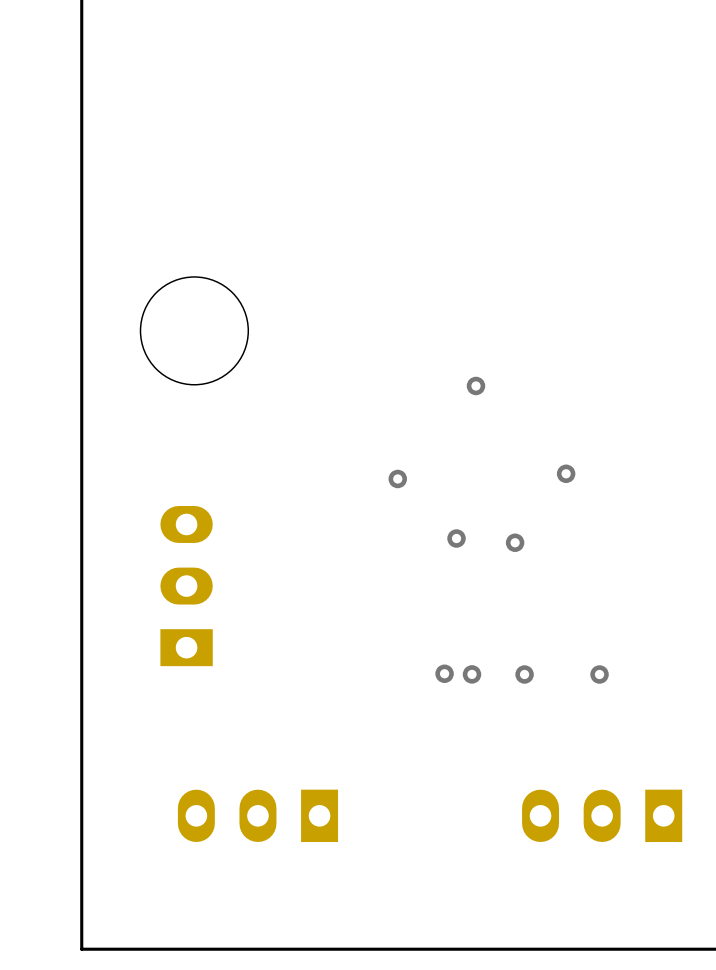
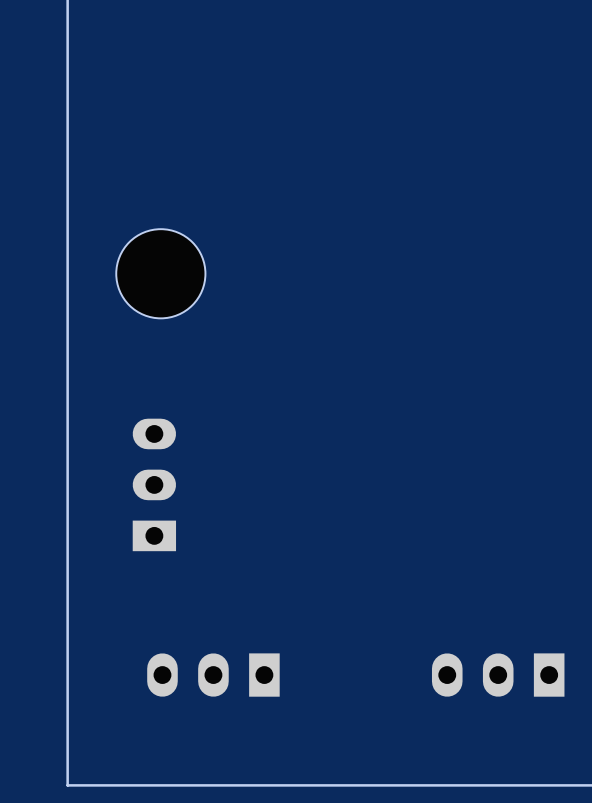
via: (475, 385) -> none
via: (566, 473) -> none
via: (397, 478) -> none
via: (456, 538) -> none
via: (515, 542) -> none
via: (444, 673) -> none
via: (472, 674) -> none
via: (524, 674) -> none
via: (599, 674) -> none

